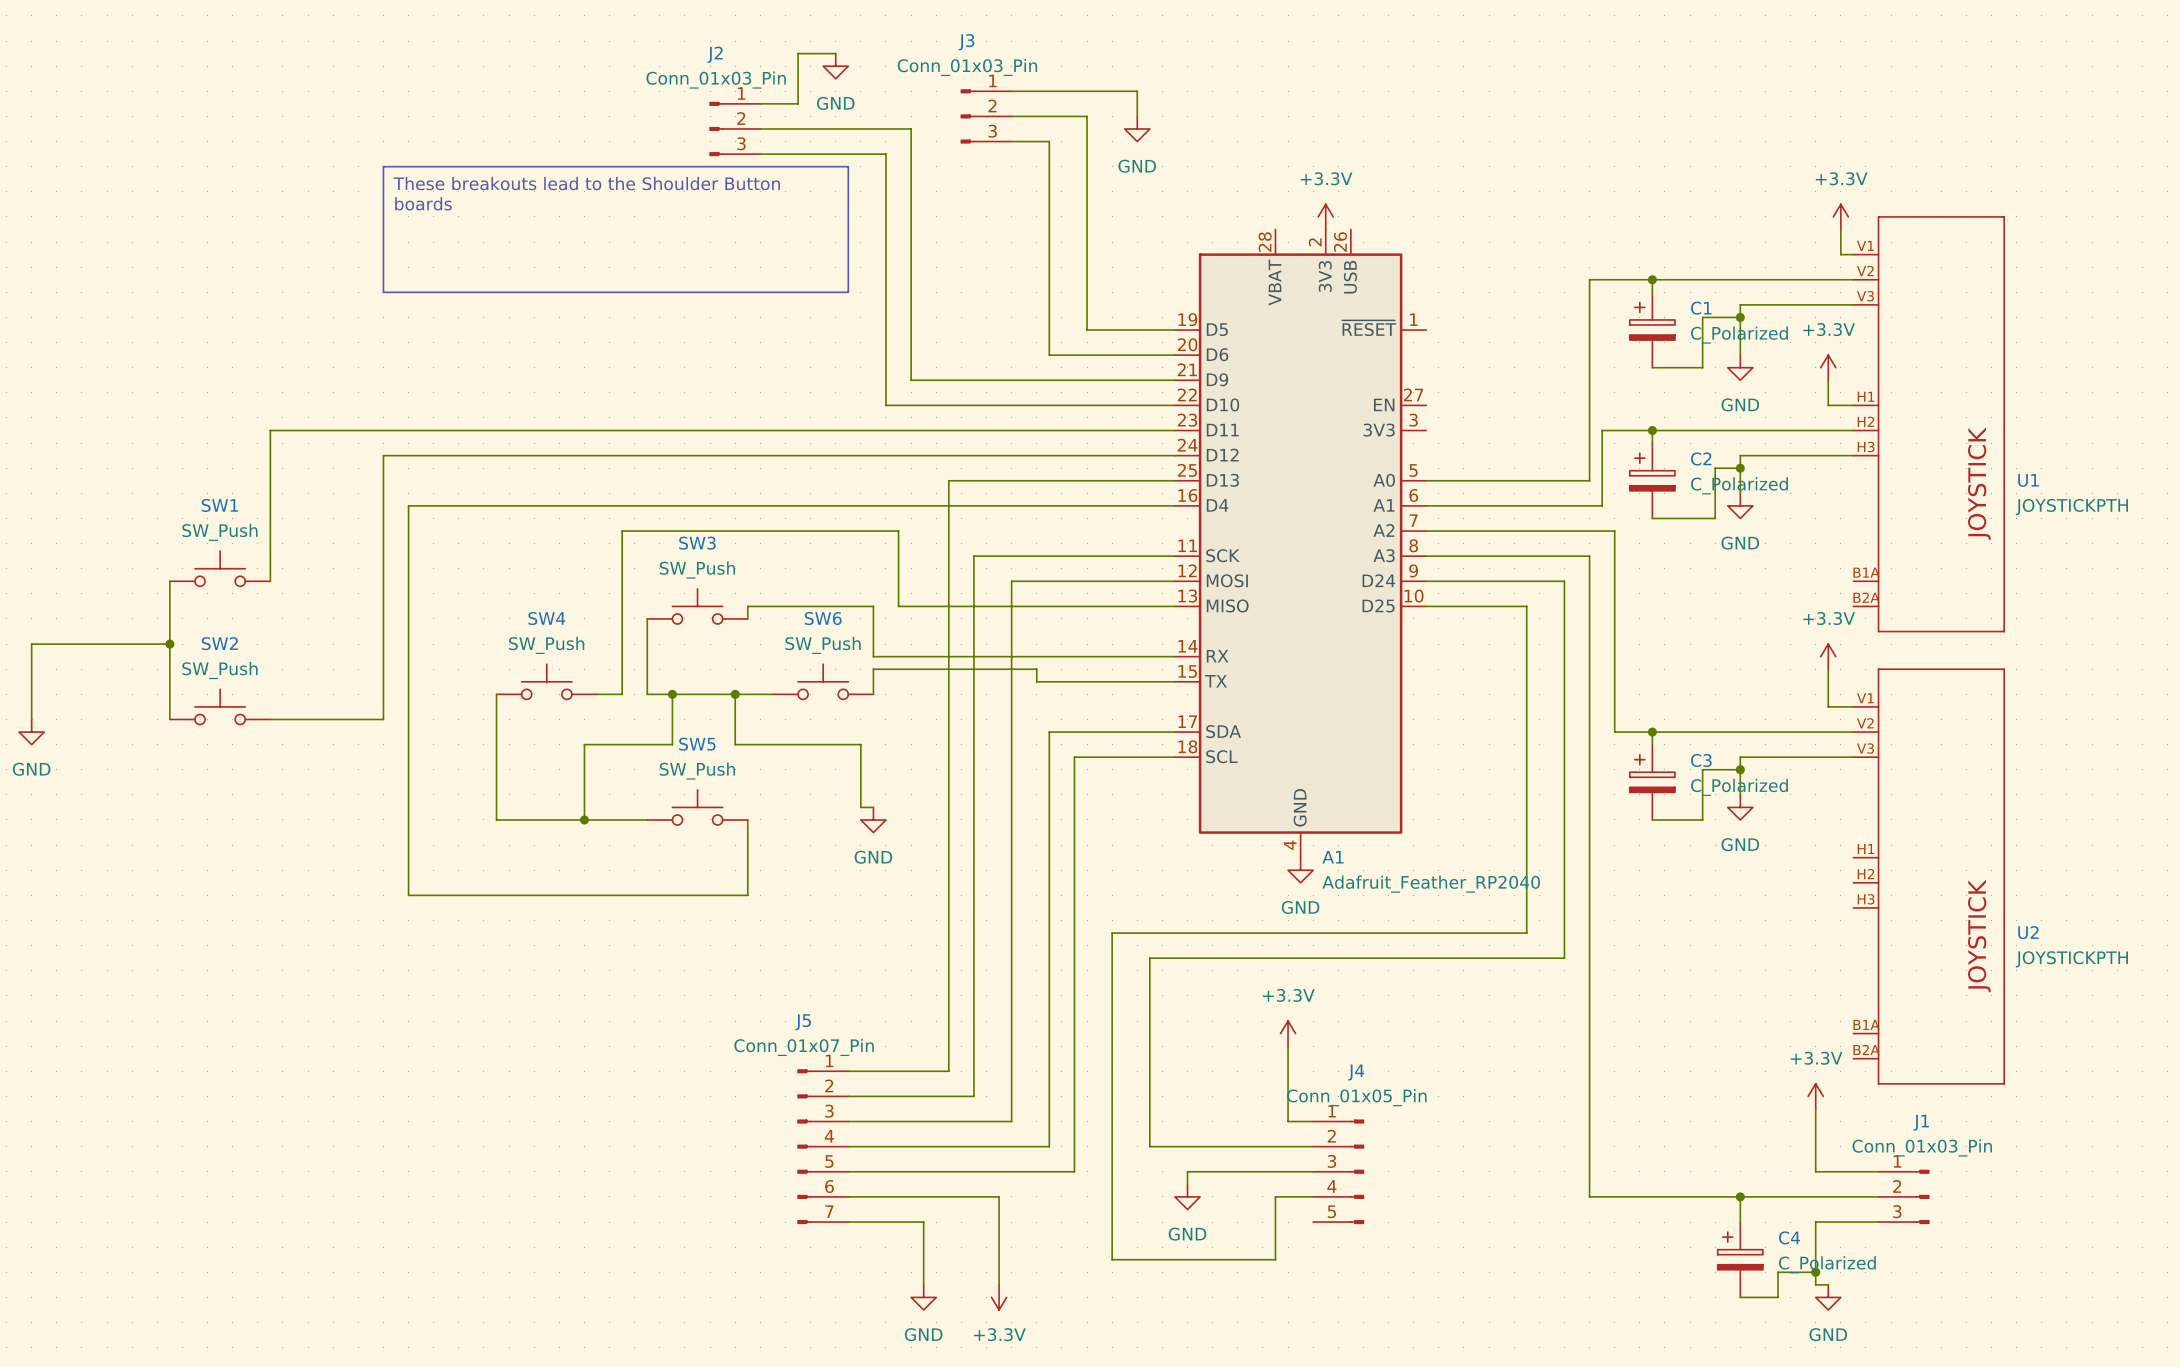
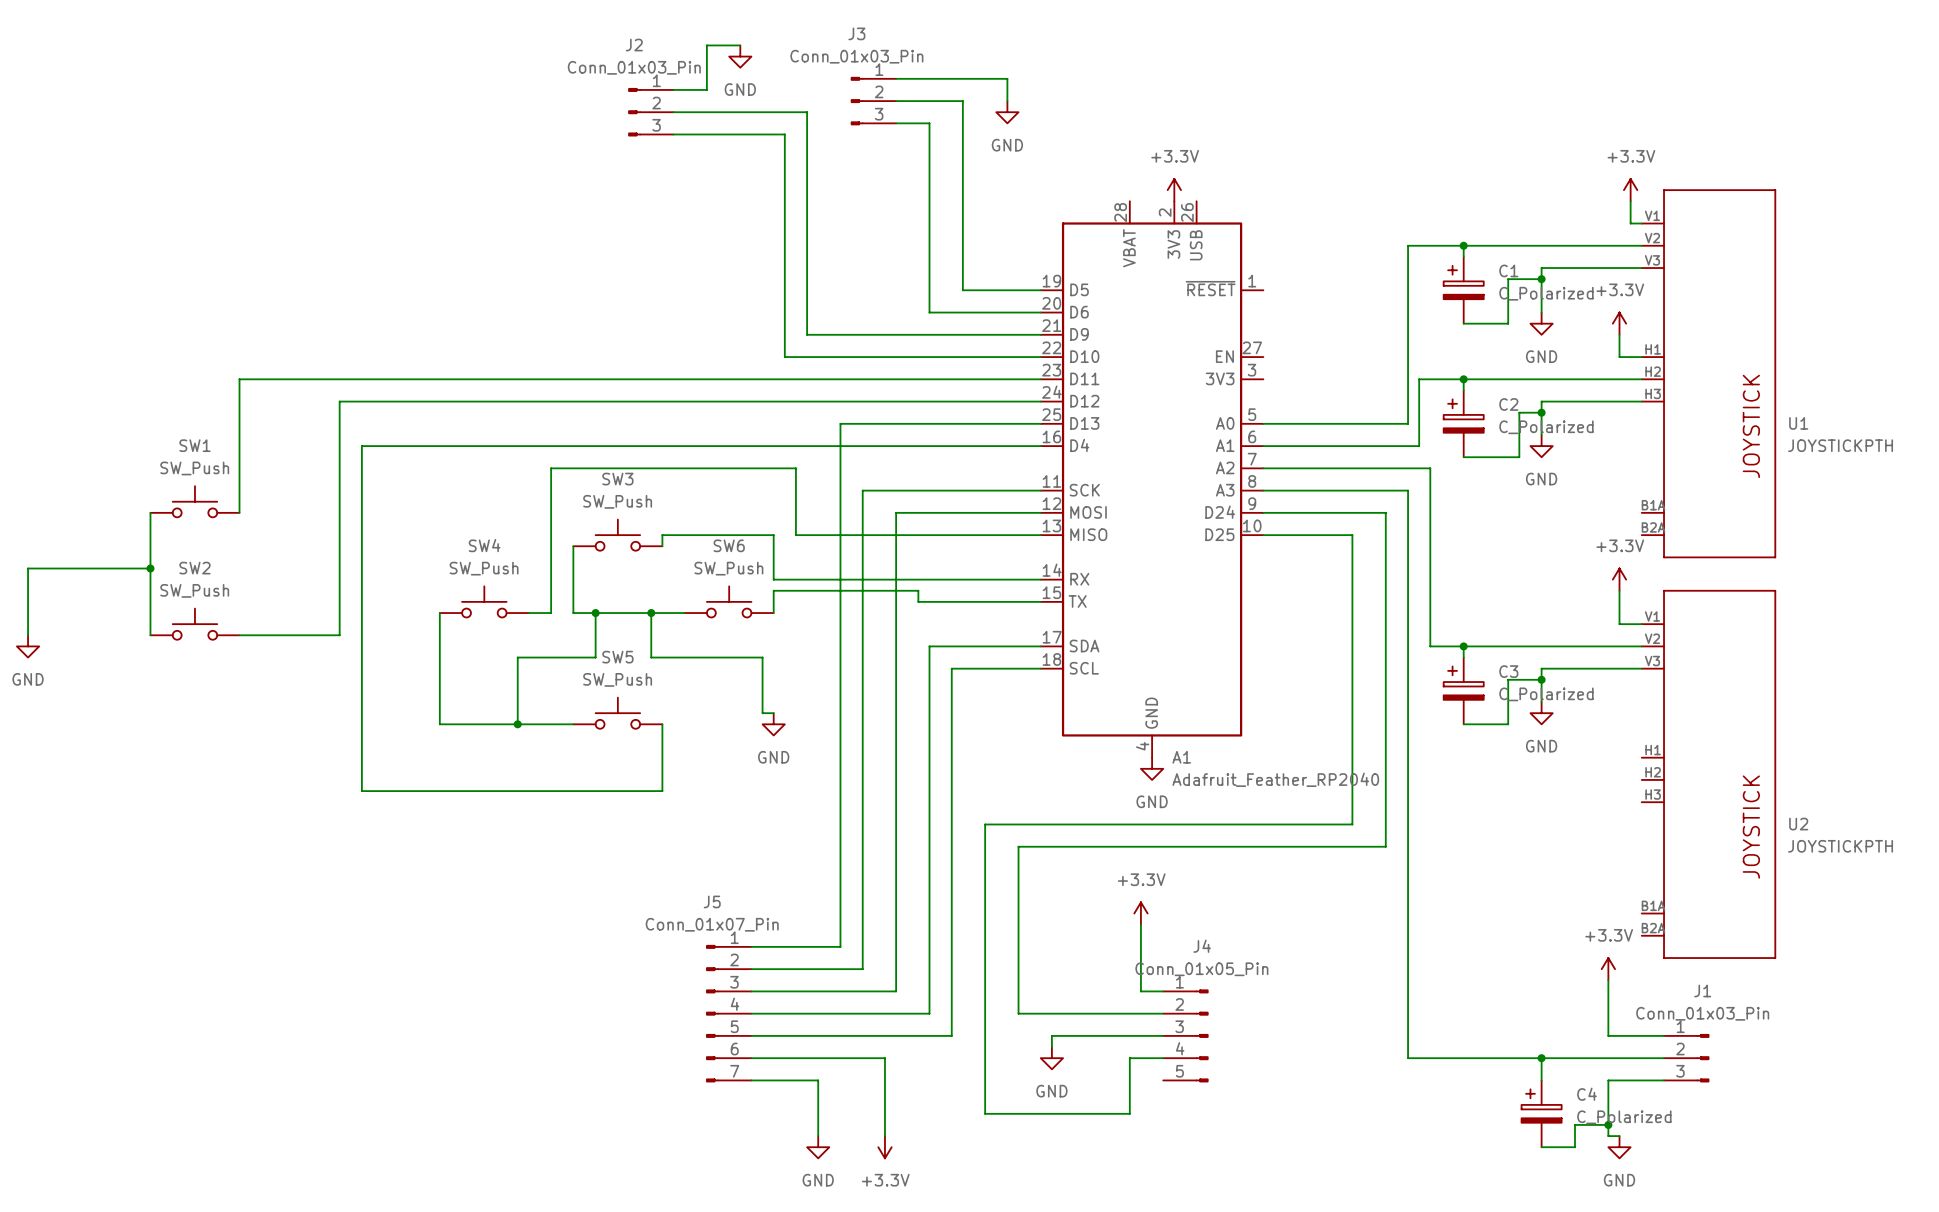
line: (383, 166) (848, 166) (848, 292) (383, 292) (383, 166) -> none
text: These breakouts lead to the Shoulder Button (586, 183) -> none
text: boards (423, 203) -> none

